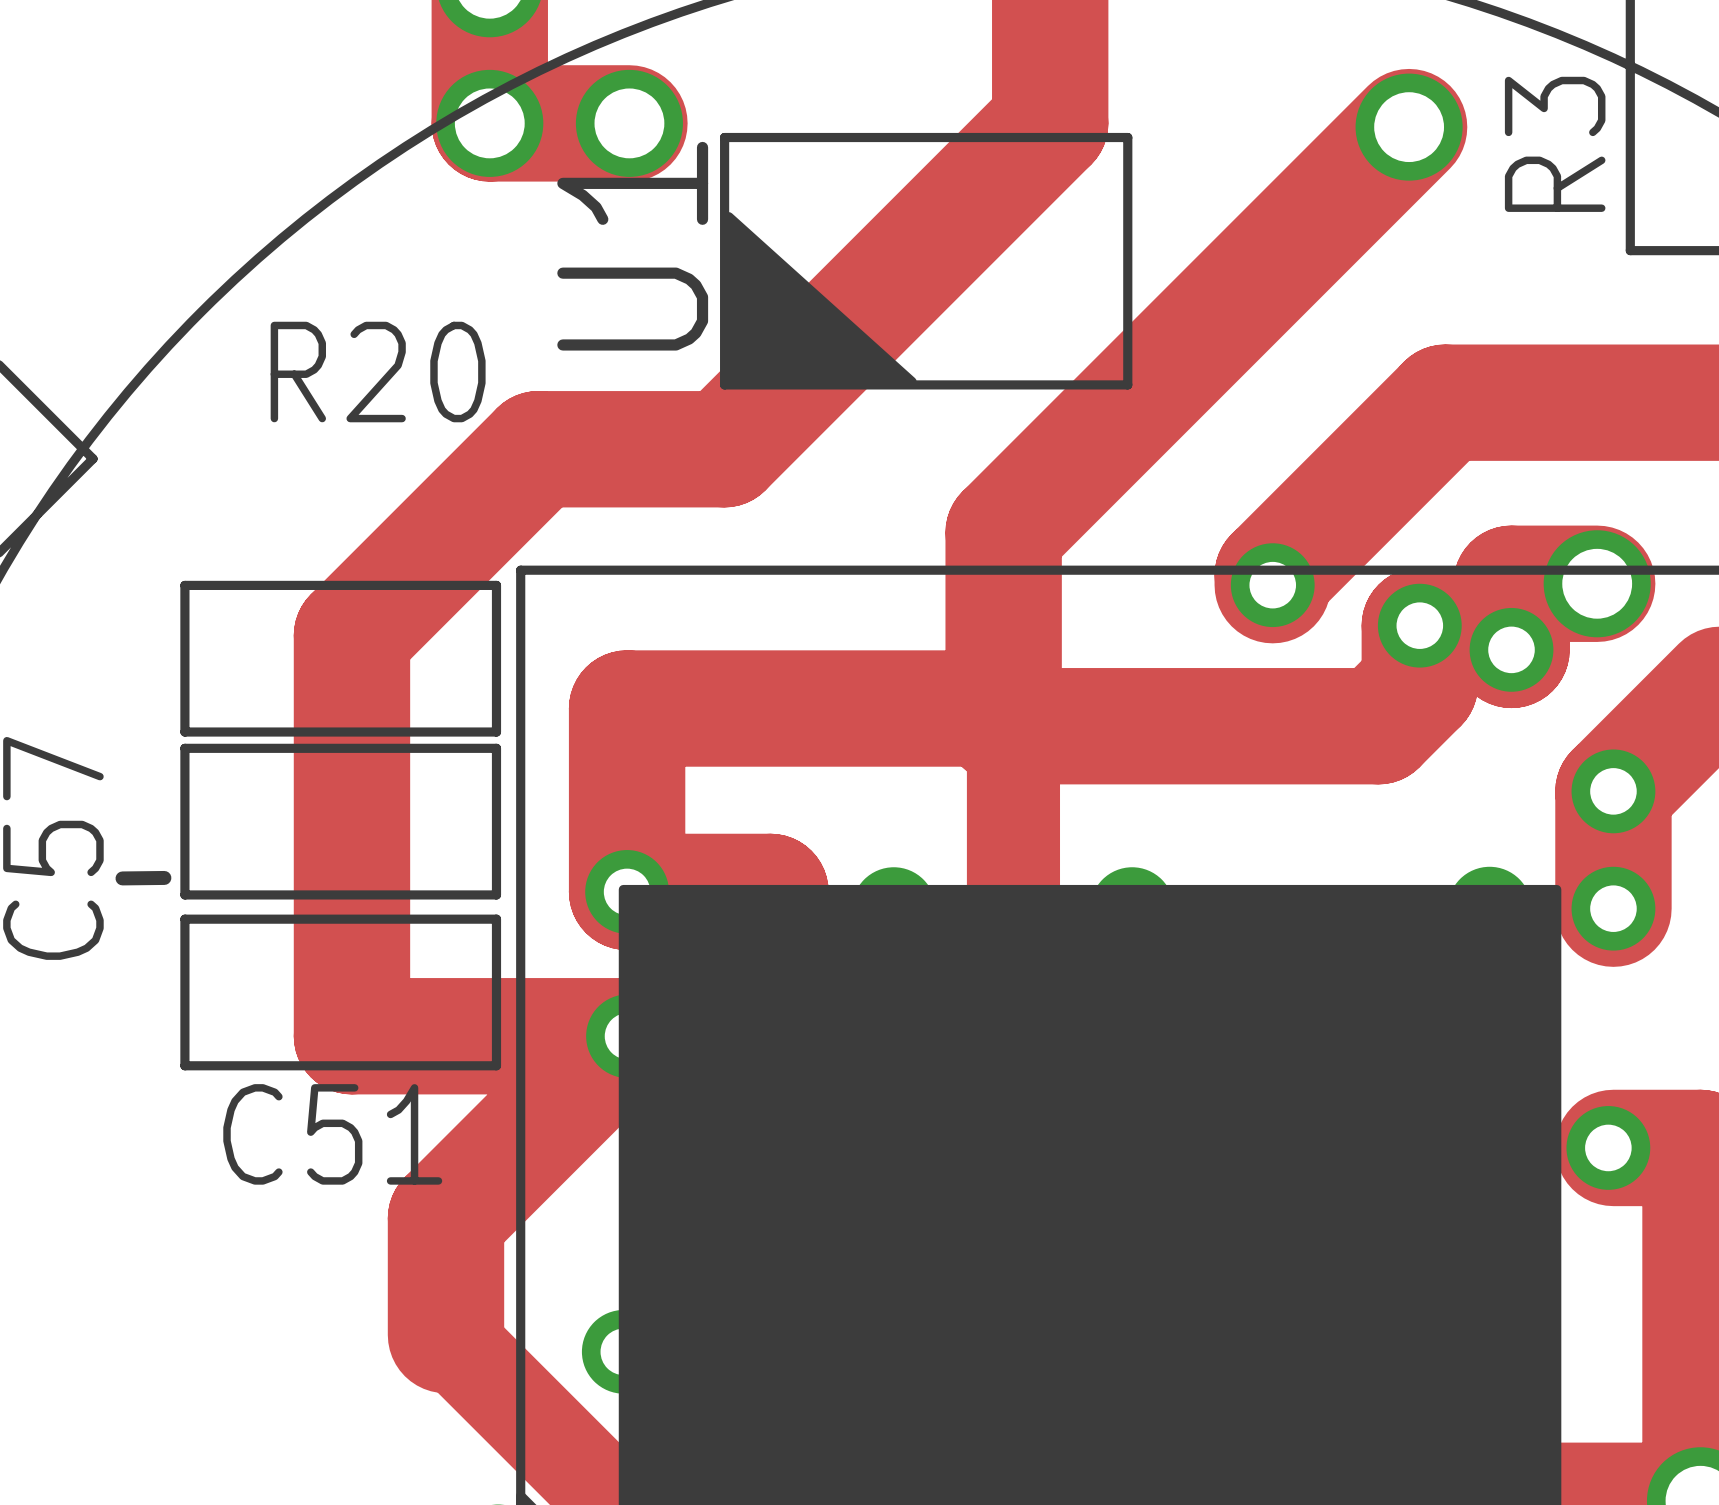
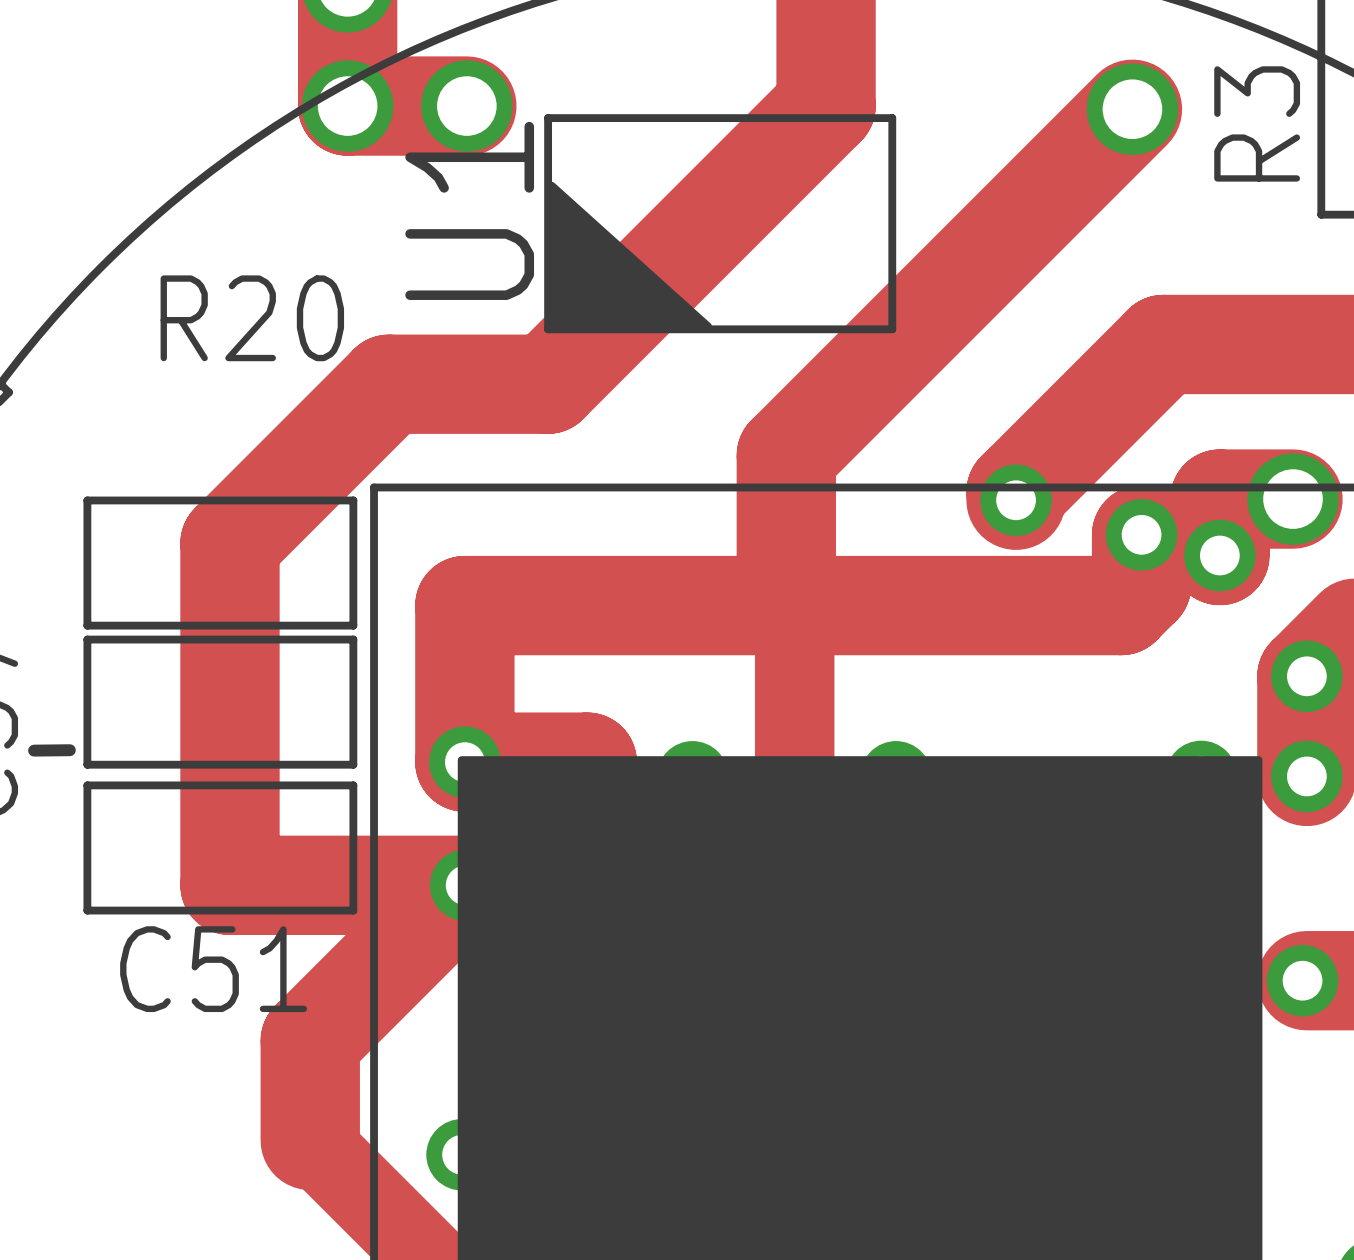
track: (1003, 708) (1003, 726) (1378, 726) (1396, 708) -> (786, 605) (1121, 605)

